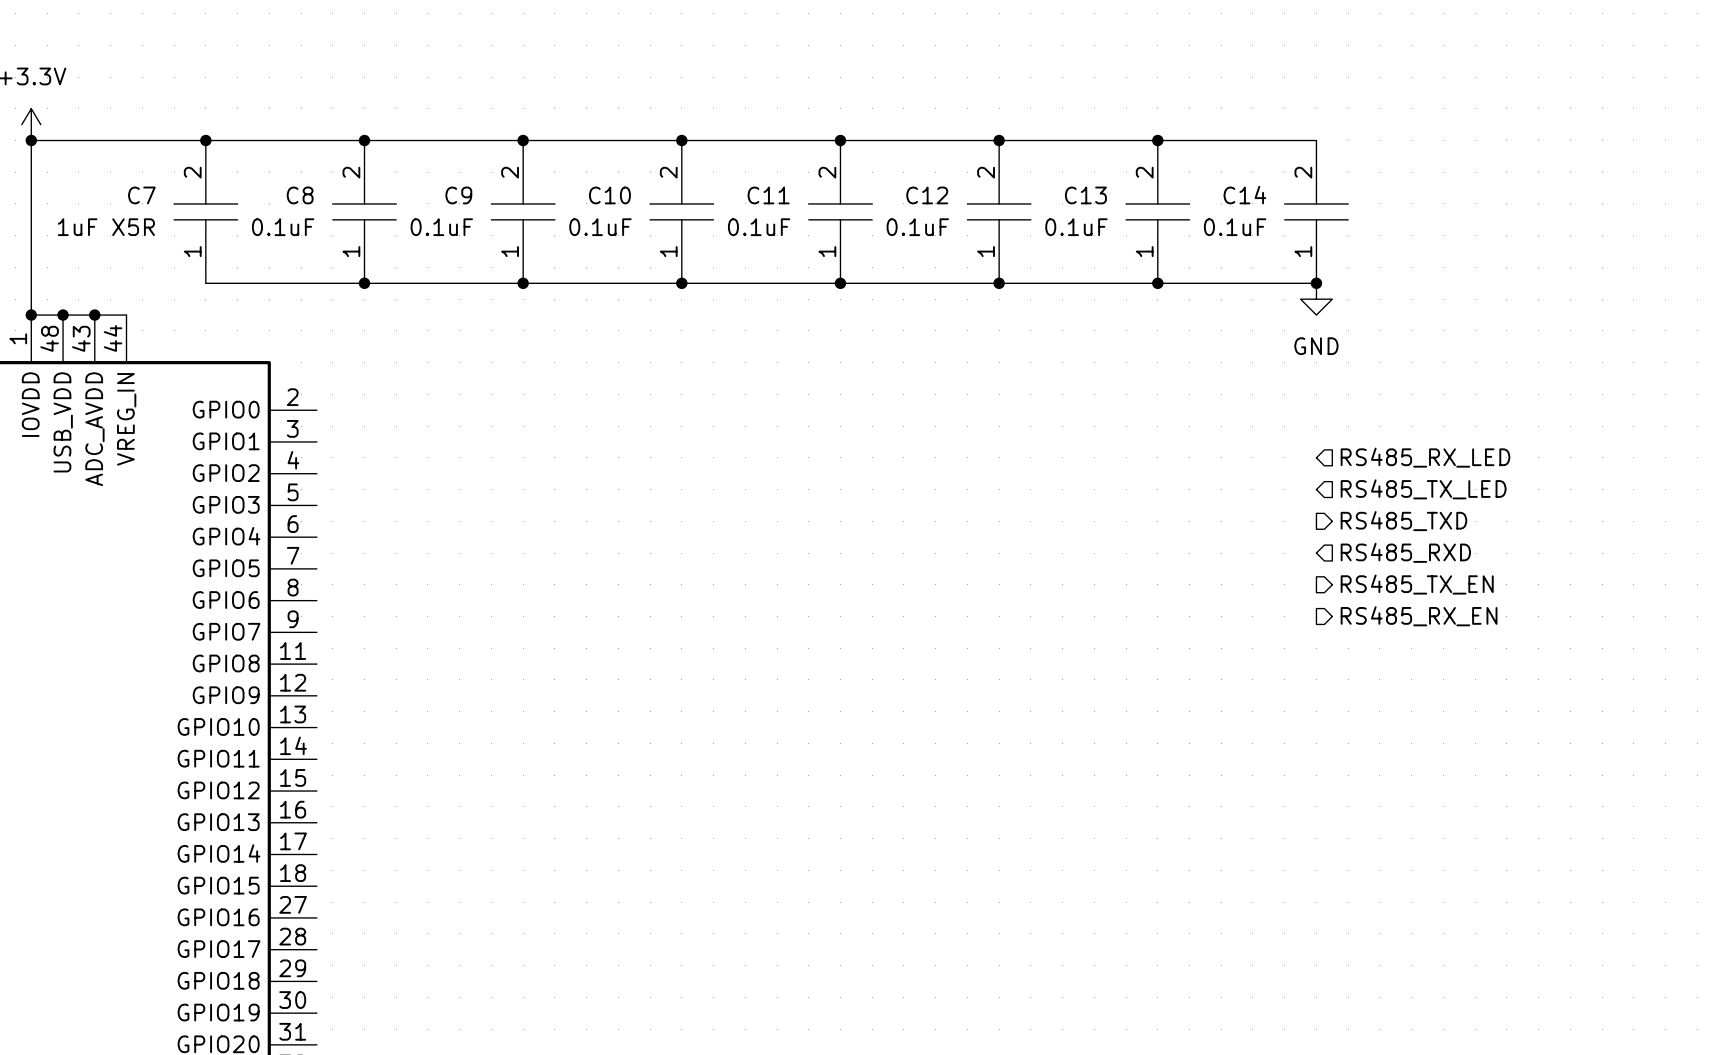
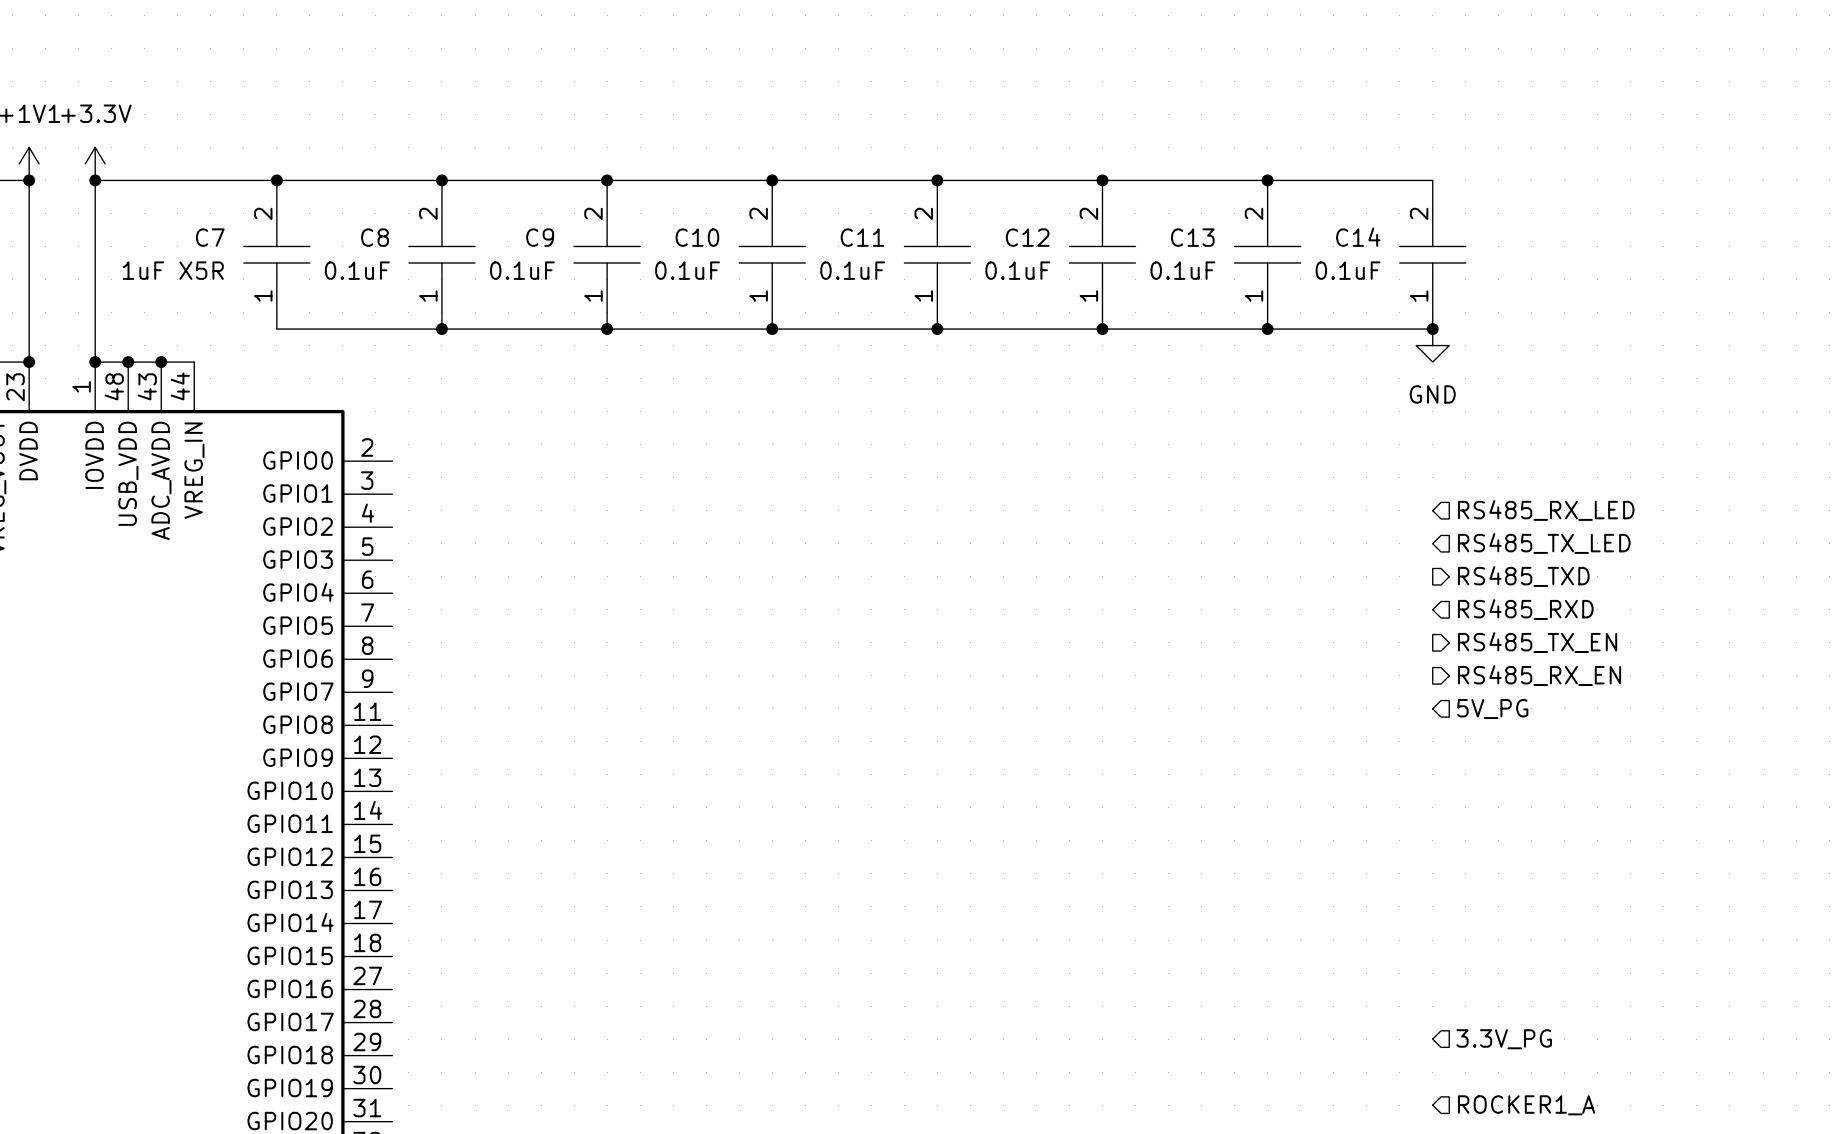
hierarchical label: none -> 5V_PG (1492, 709)
hierarchical label: none -> 3.3V_PG (1504, 1039)
hierarchical label: none -> ROCKER1_A (1526, 1105)

